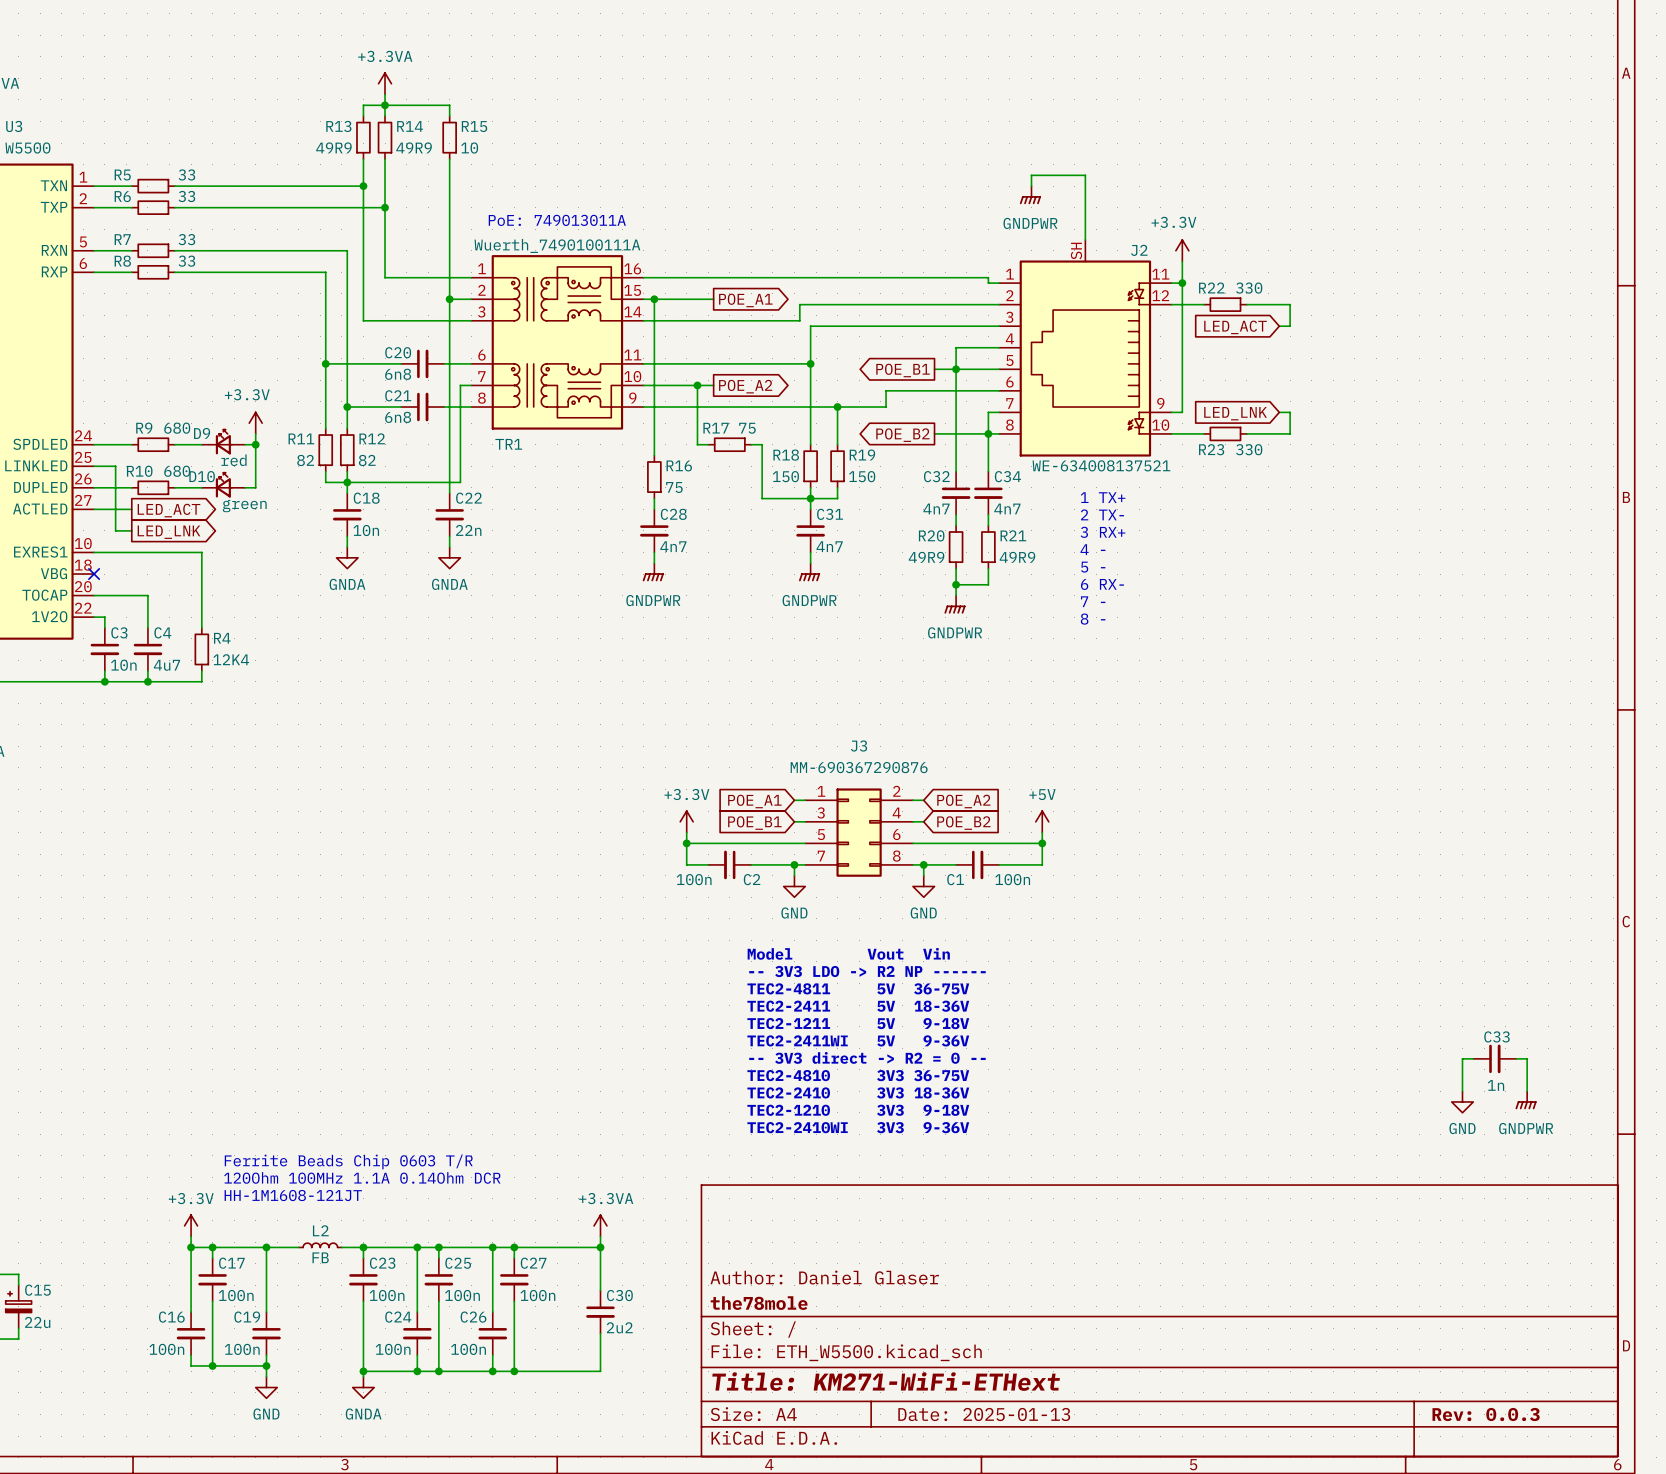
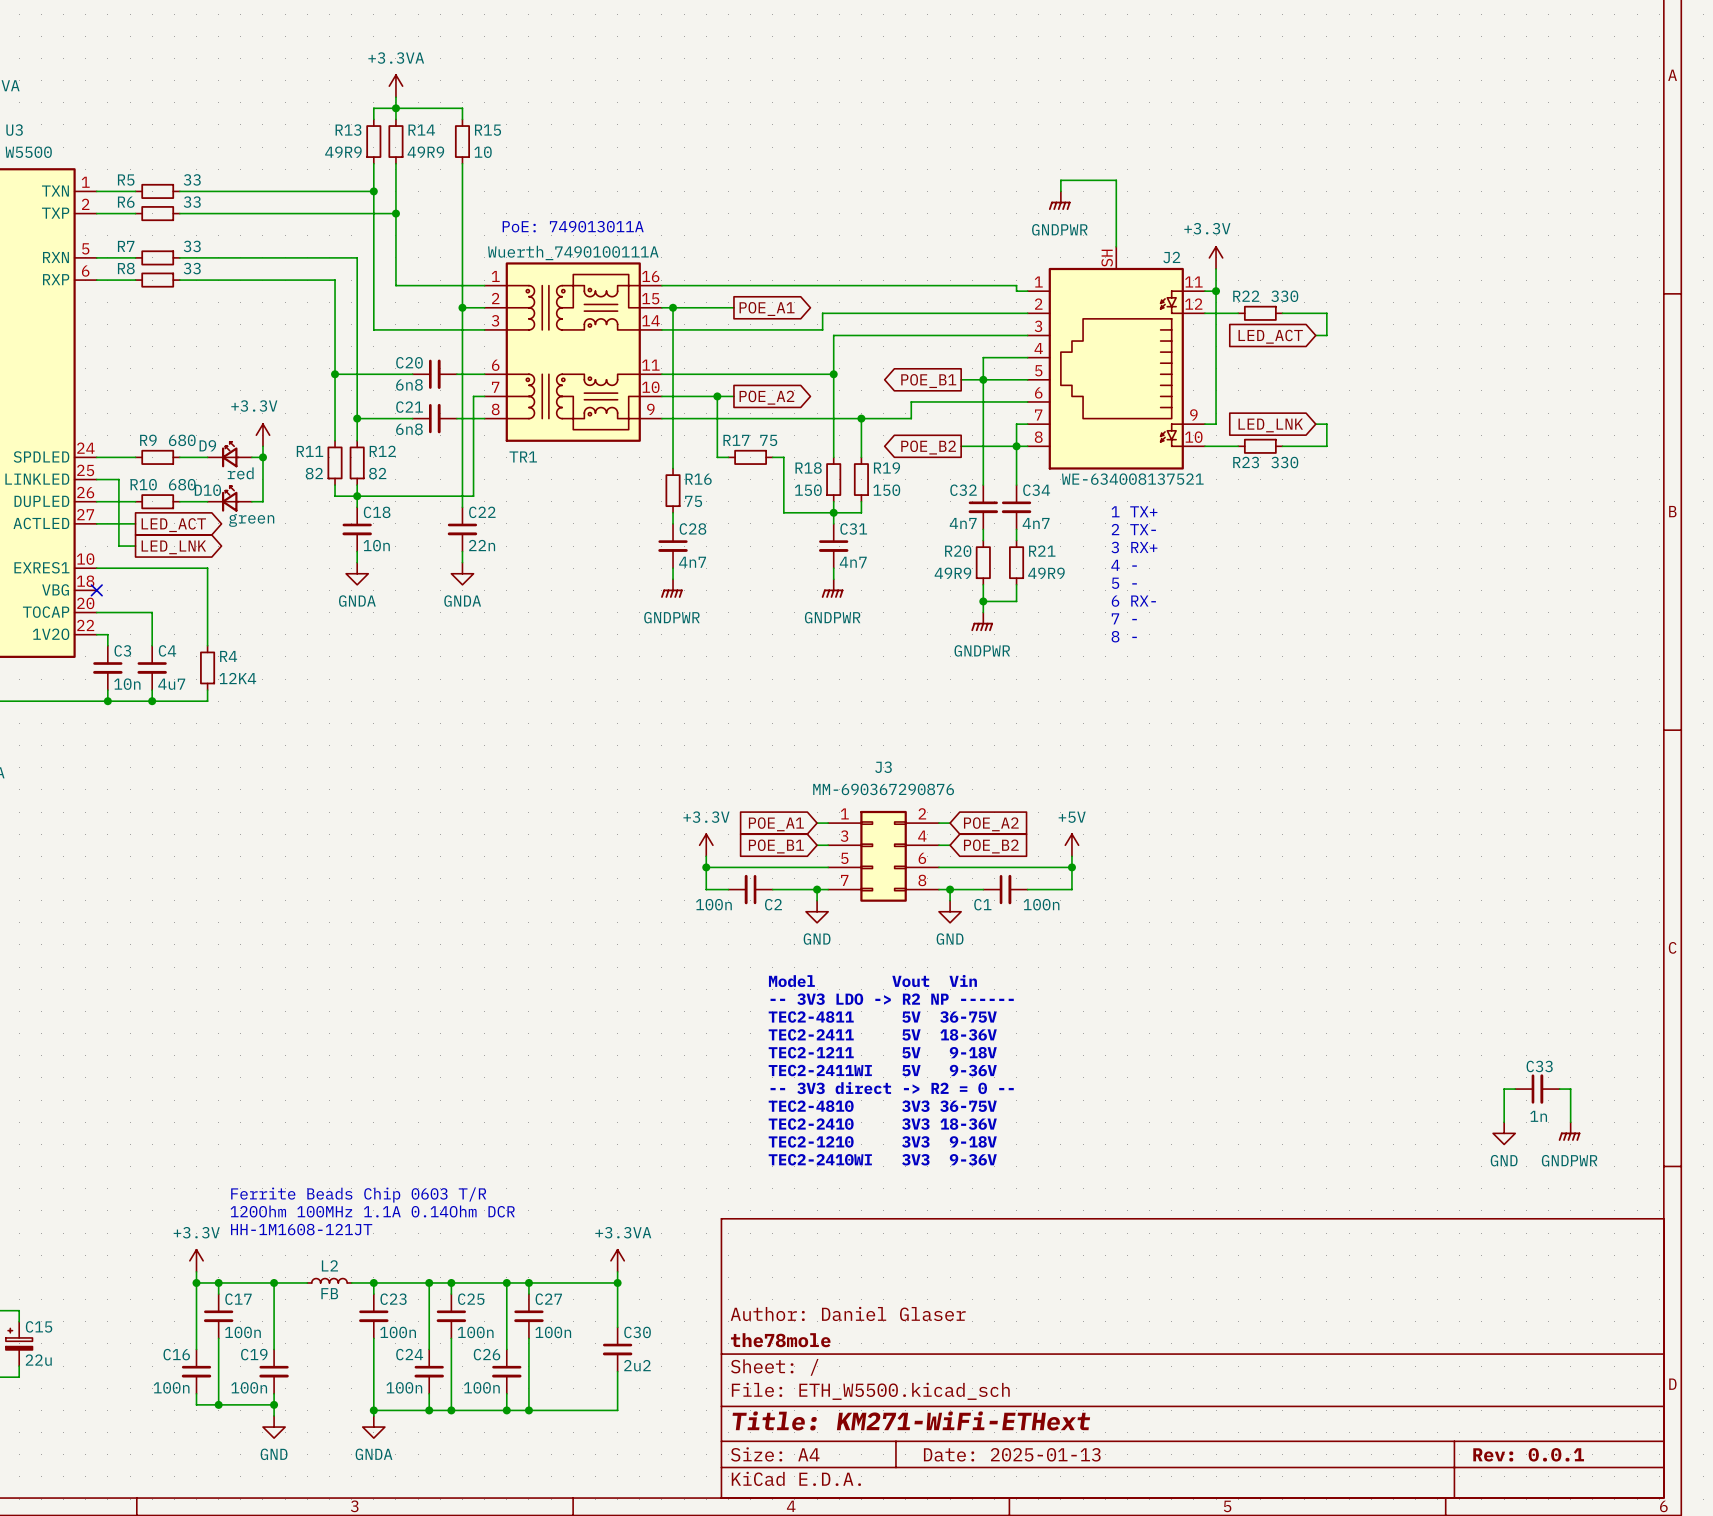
title block: Rev: 0.0.3 (1486, 1414) -> Rev: 0.0.1 (1528, 1454)

